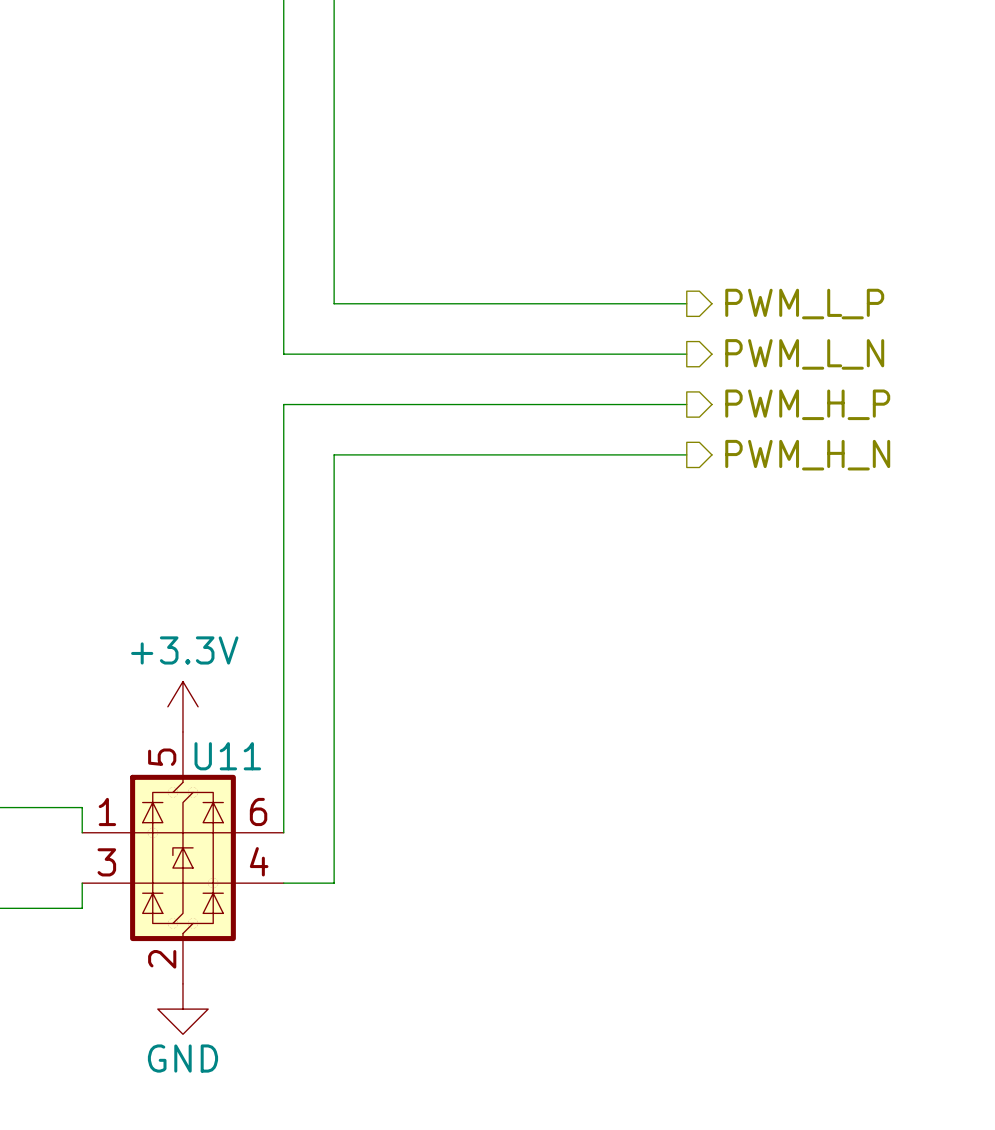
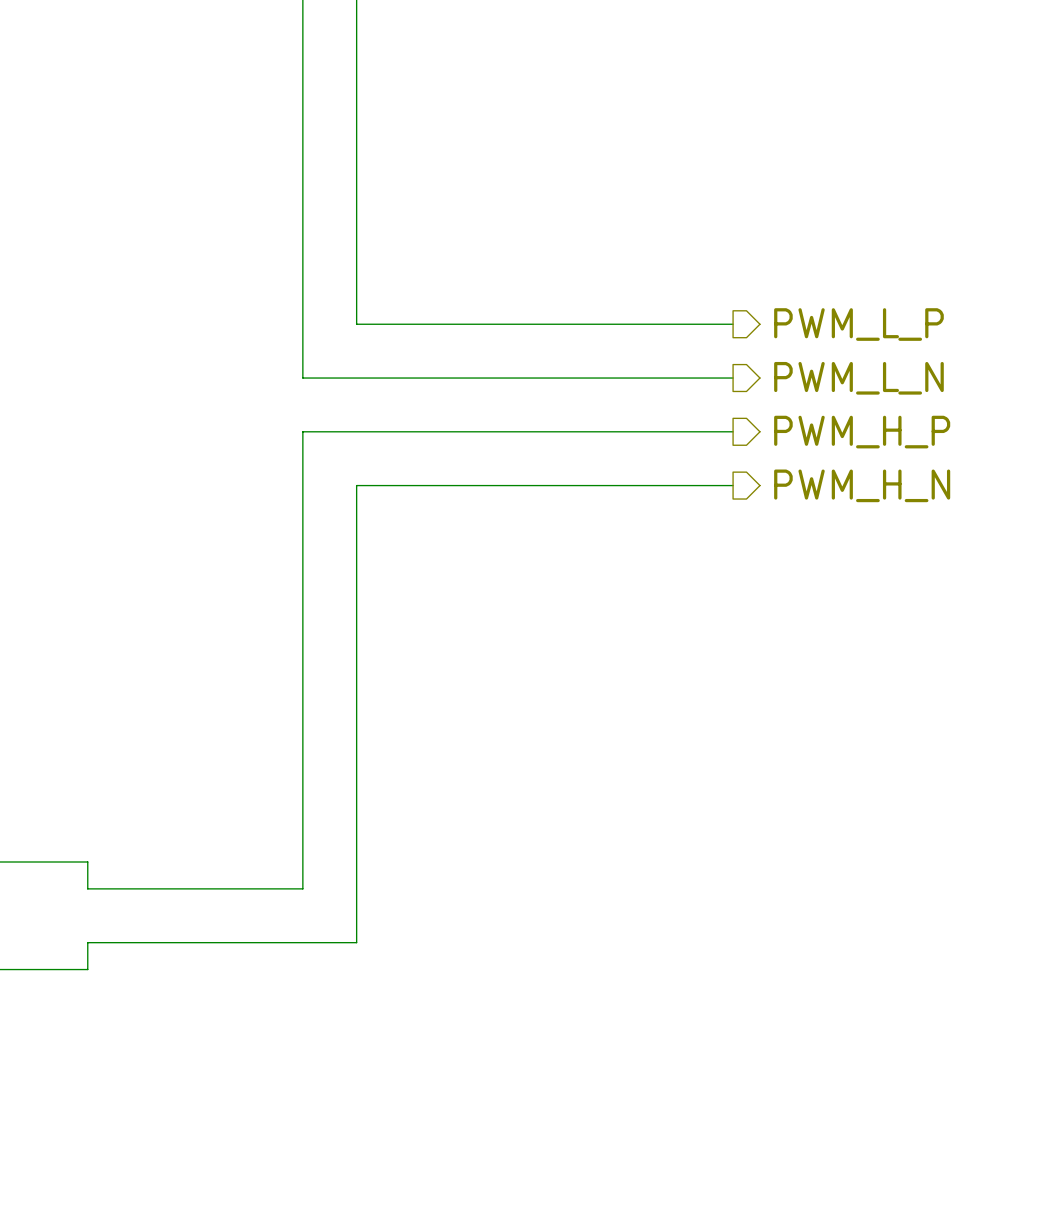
power symbol: +3.3V (182, 706) -> none
U11: (182, 857) -> none
power symbol: GND (182, 1009) -> none

